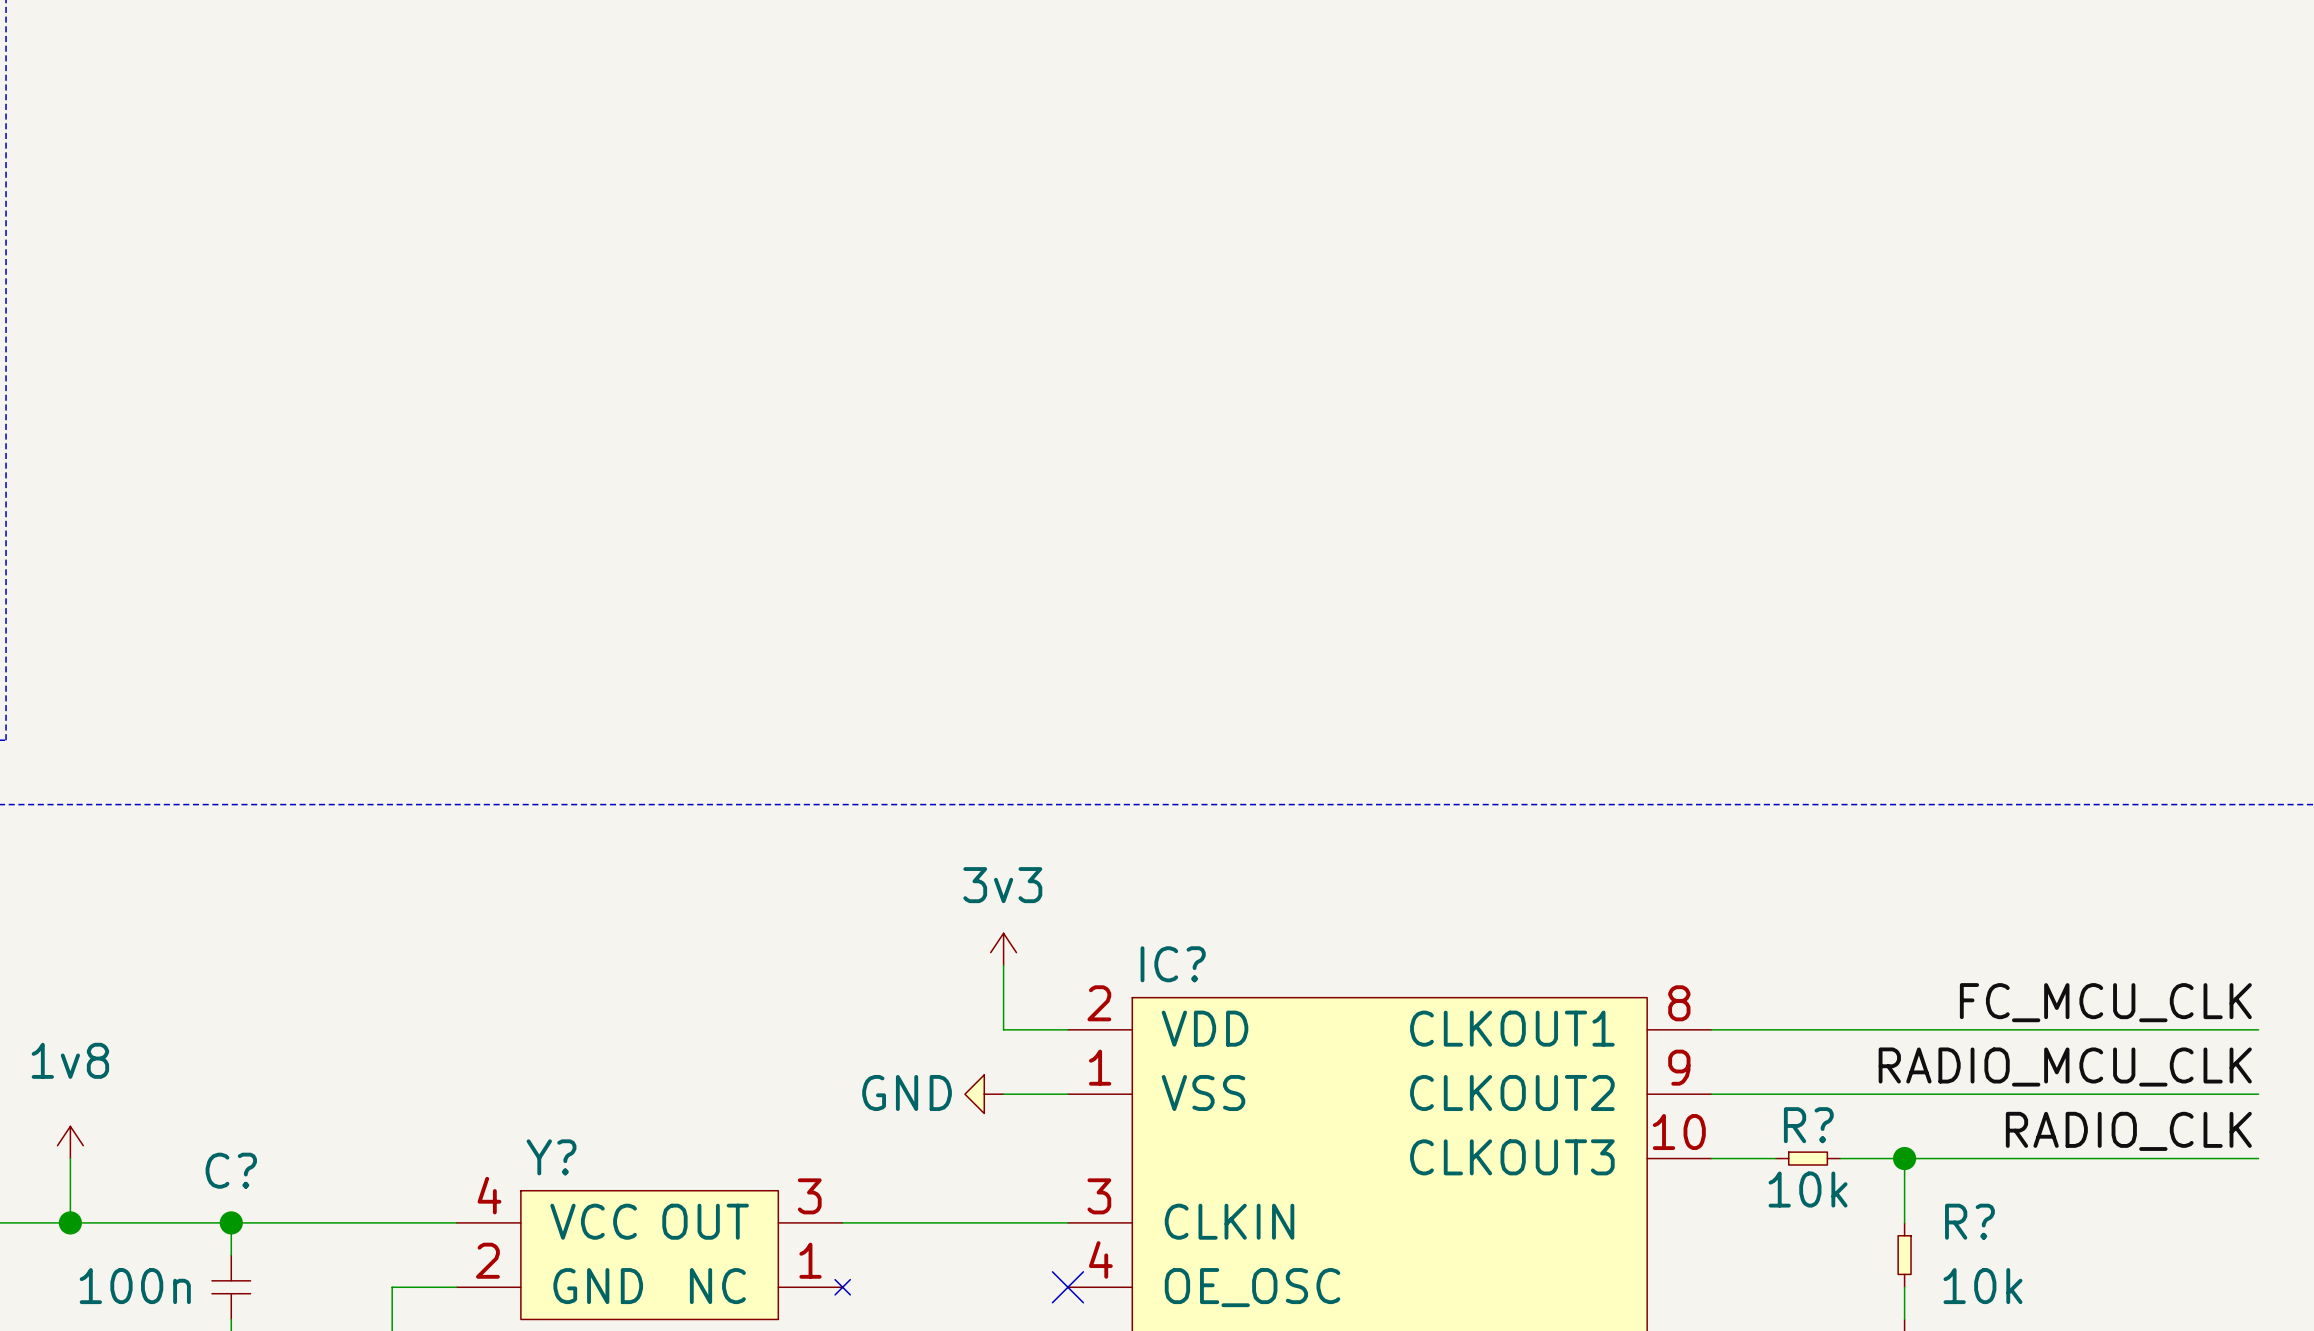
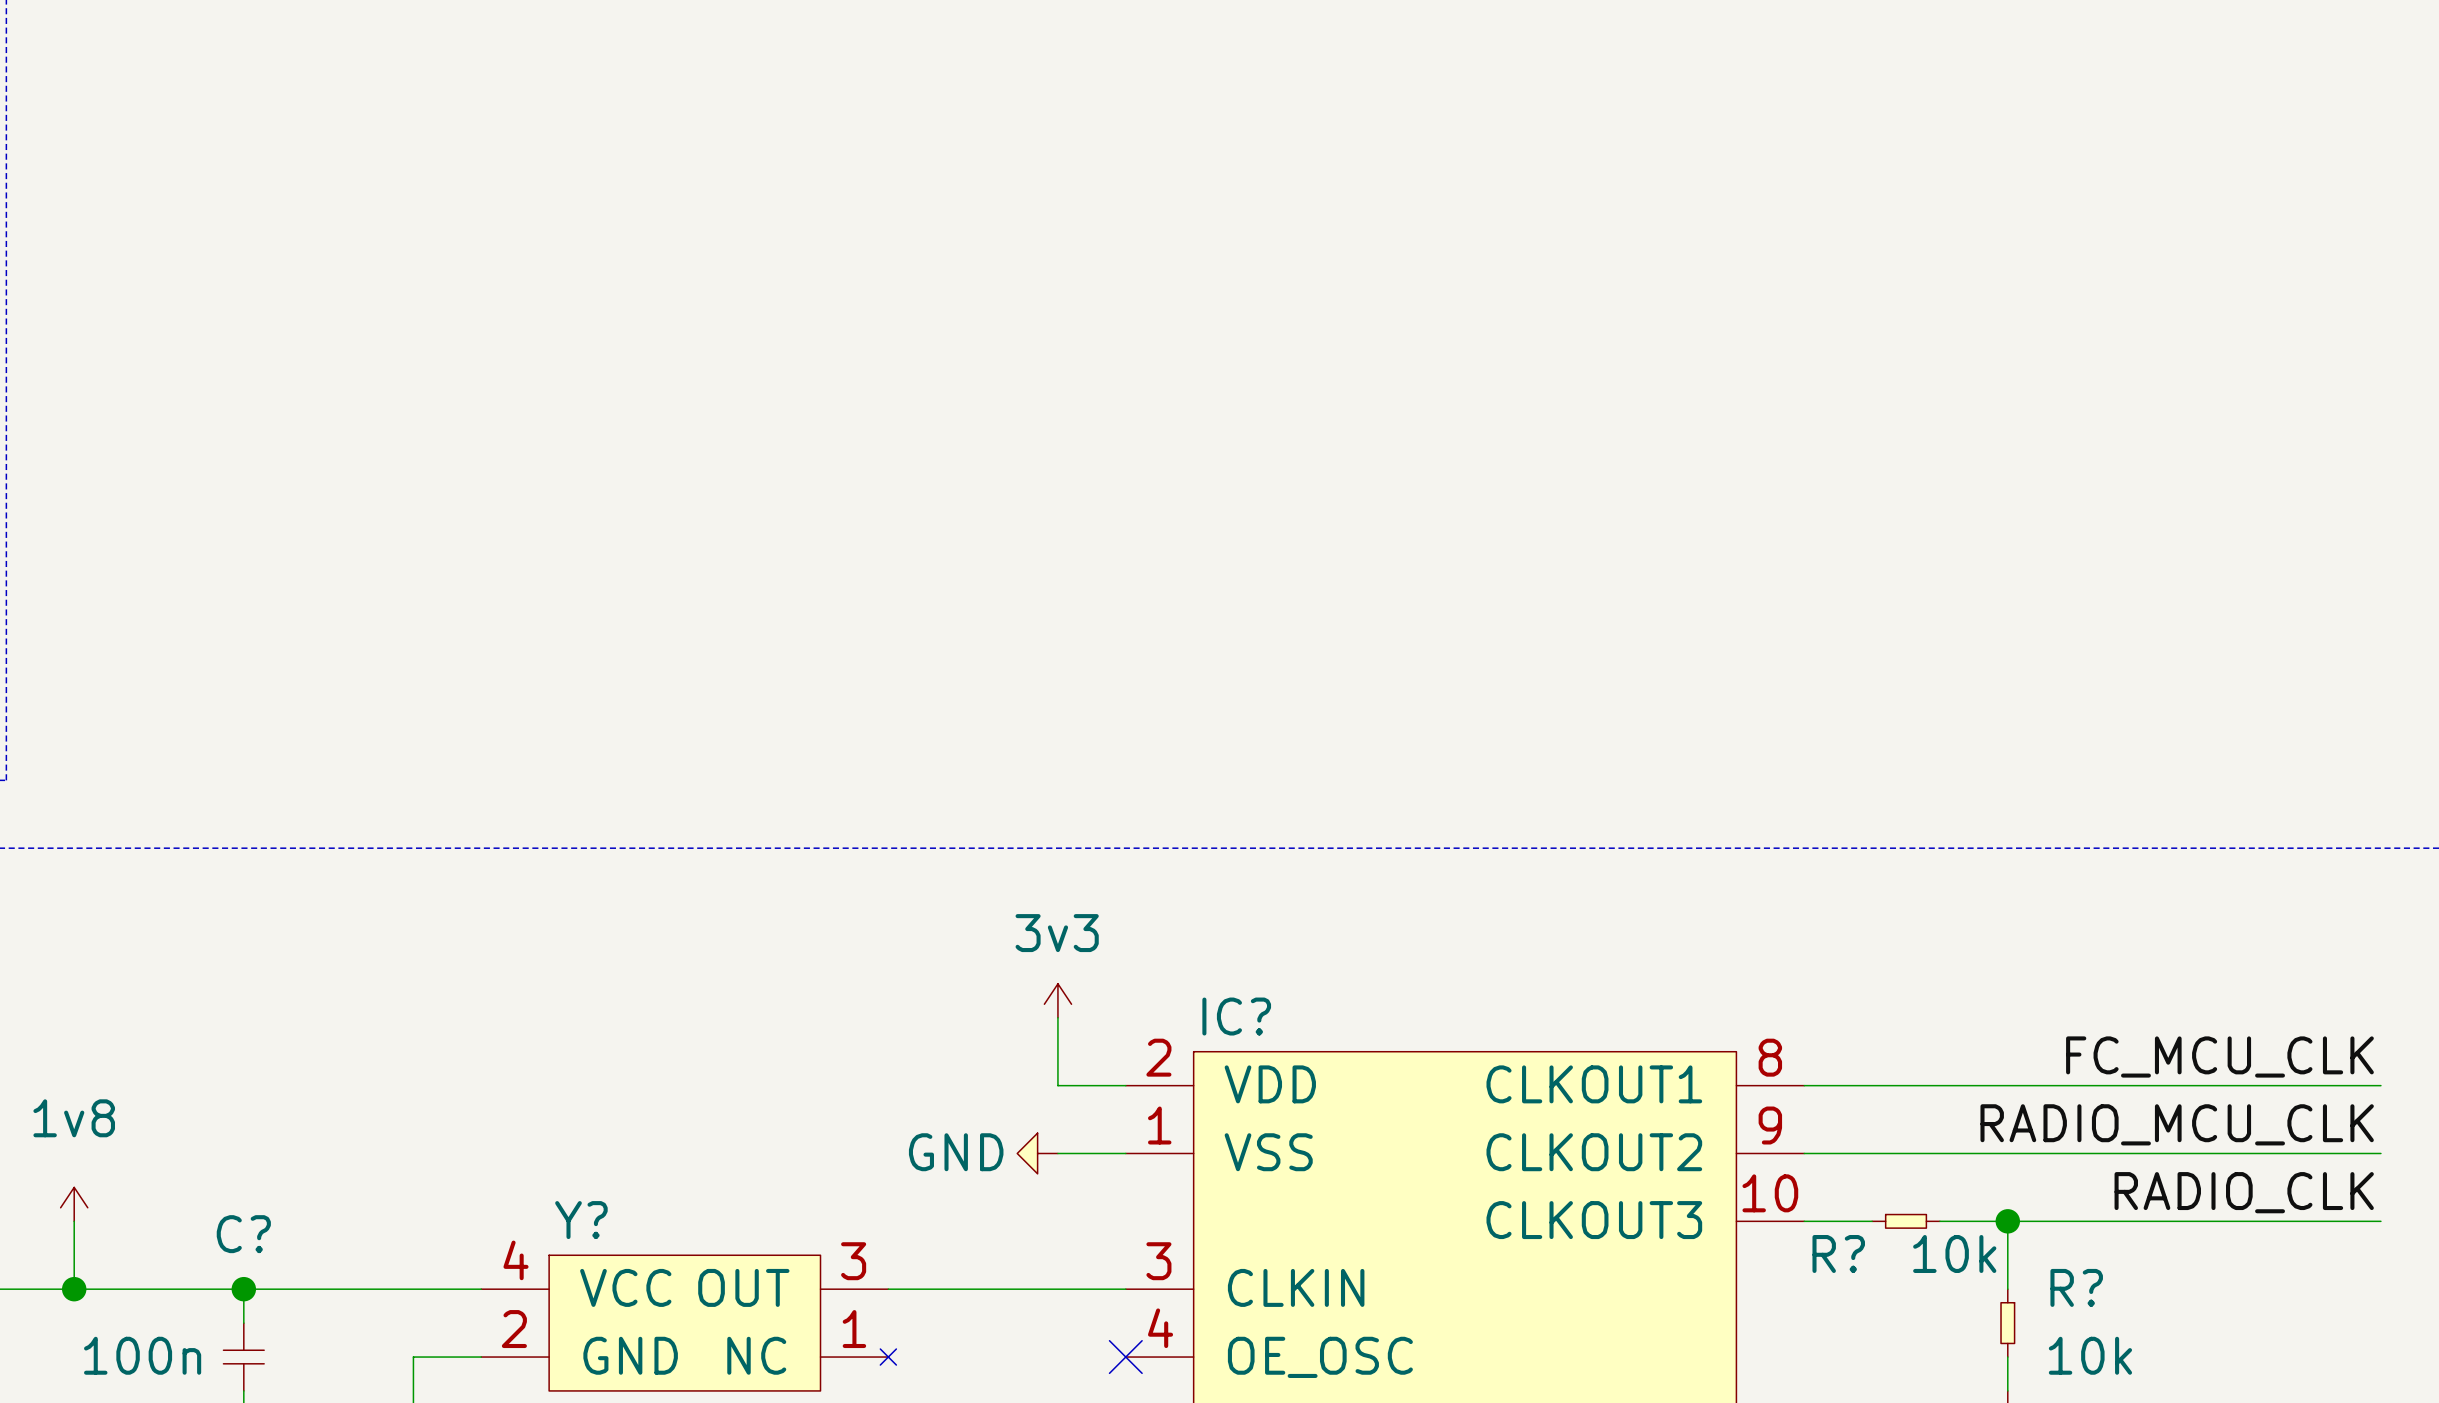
R? name position: R? (1808, 1125) -> R? (1838, 1253)
R? value position: 10k (1808, 1189) -> 10k (1954, 1253)

